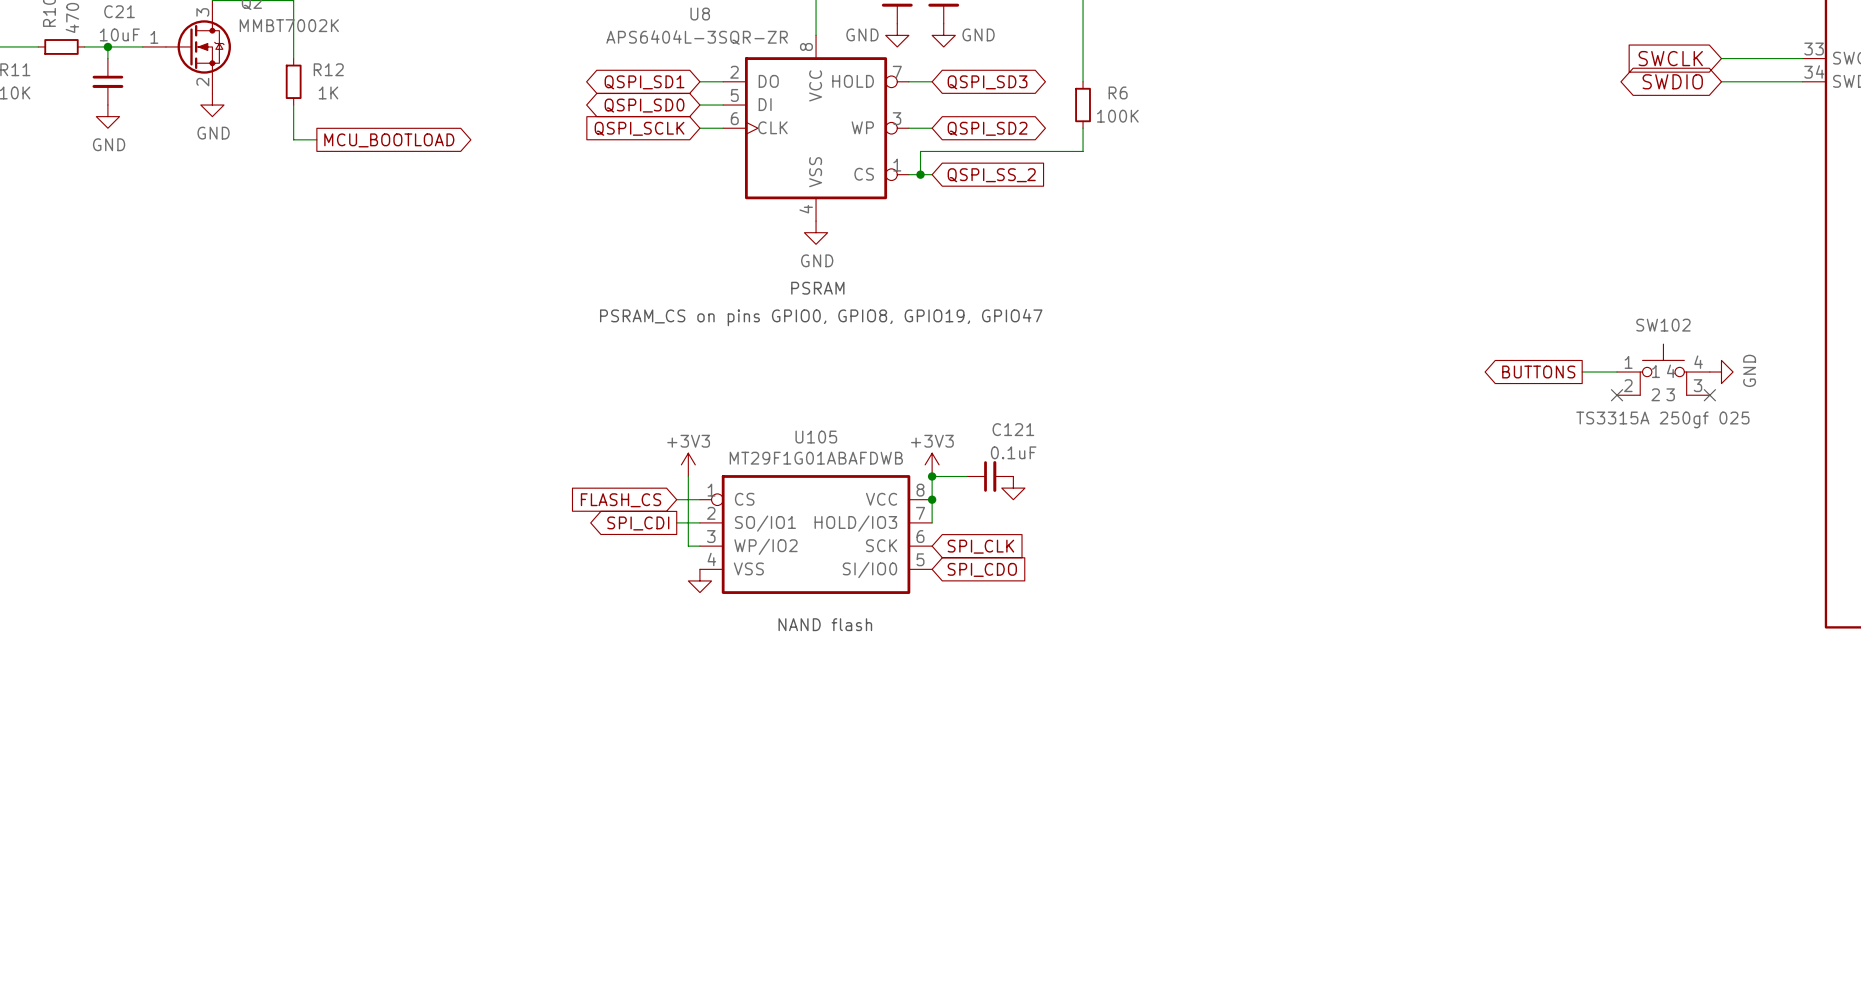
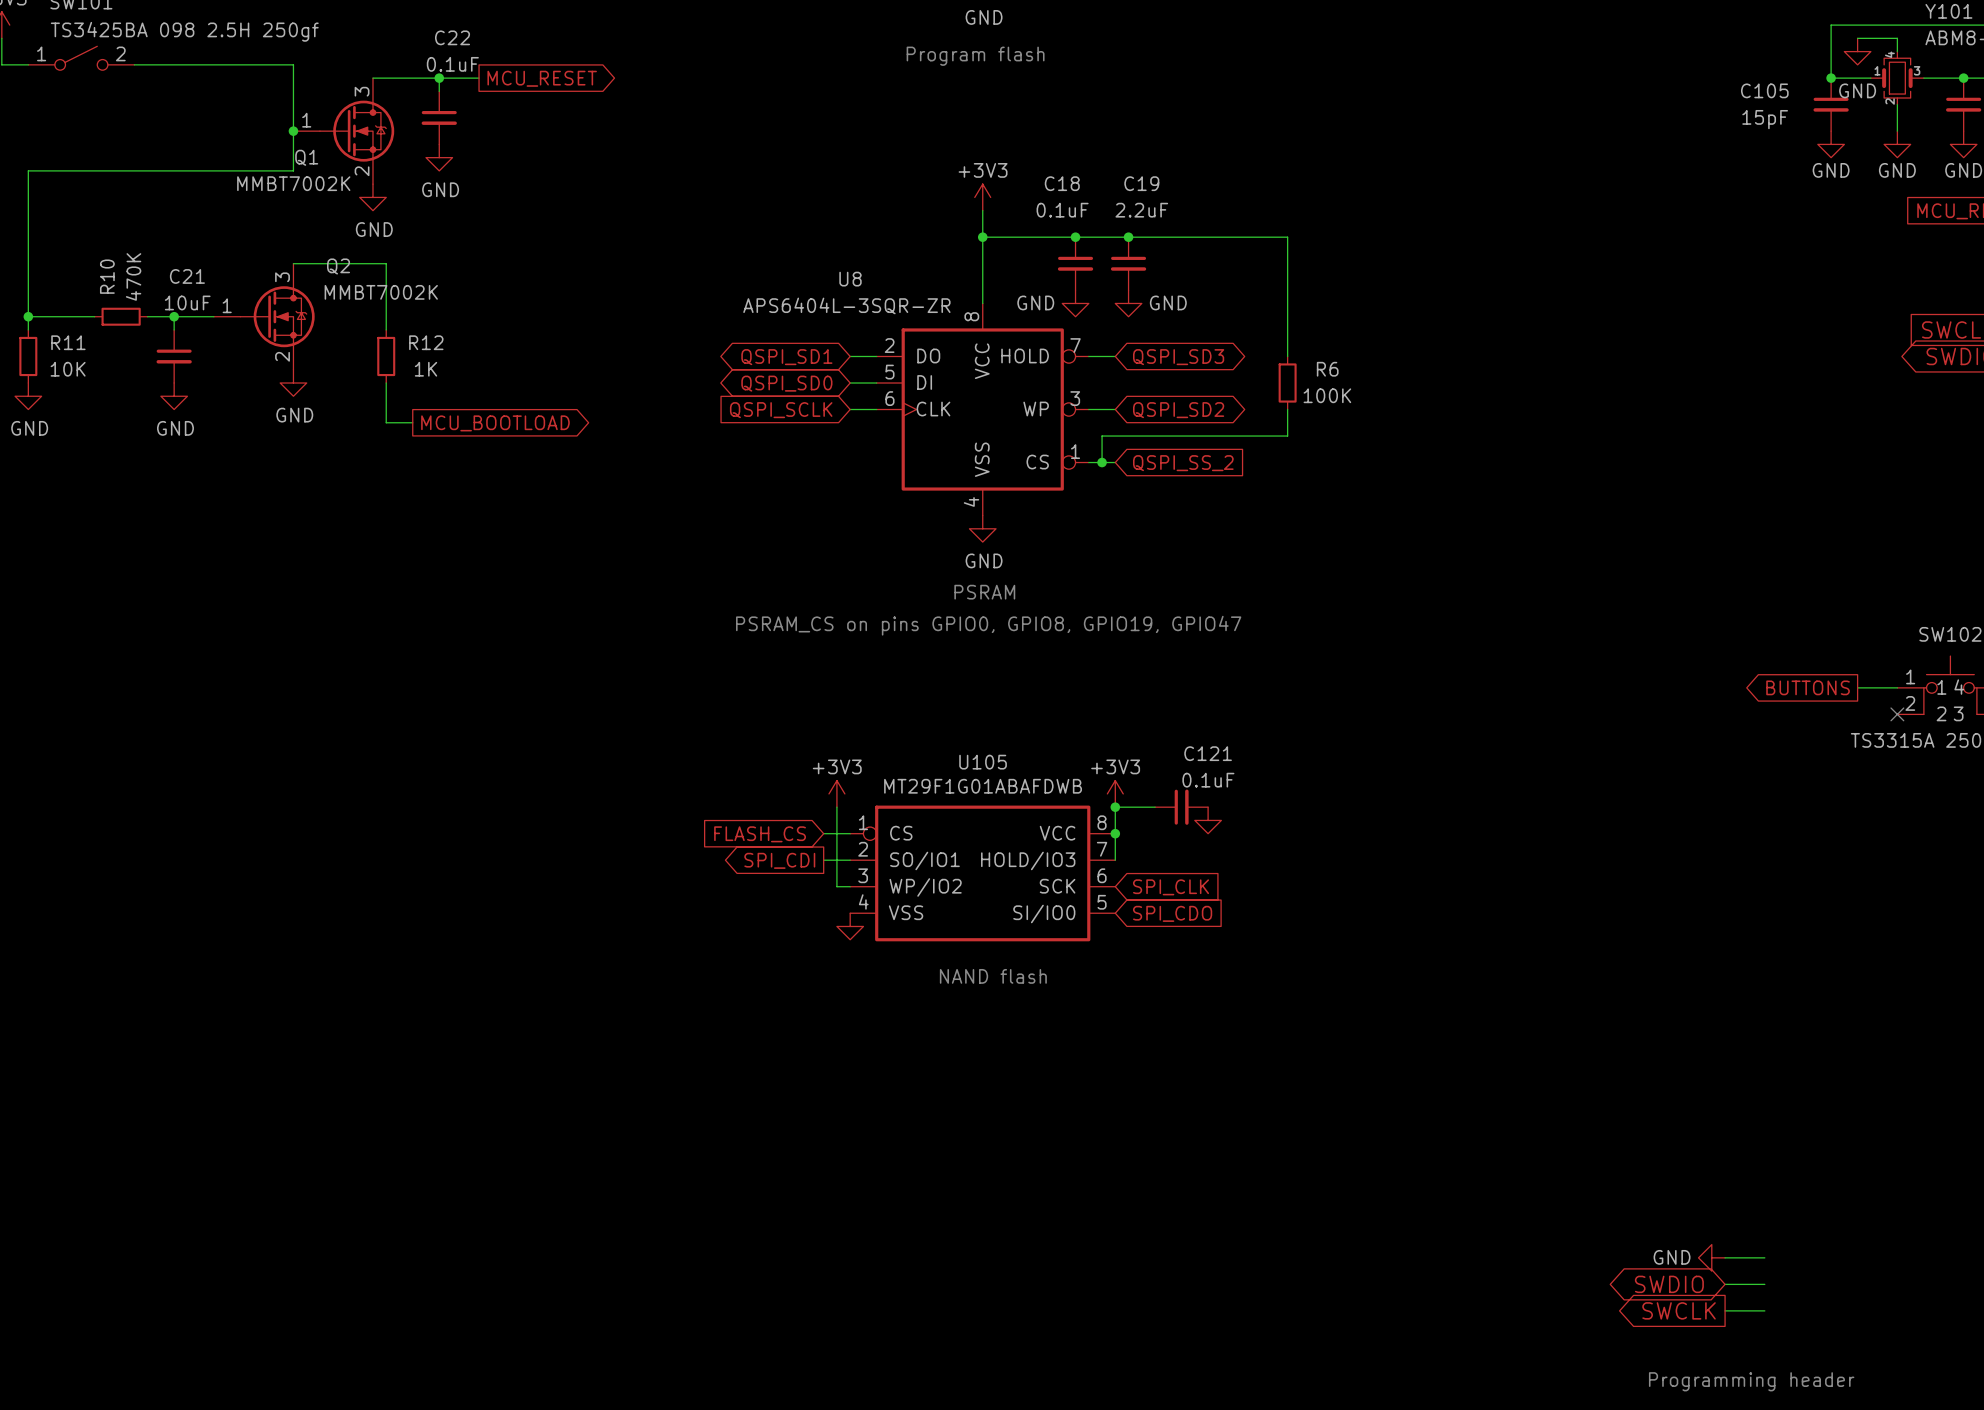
power symbol: none -> GND (1711, 1257)
wire: none -> (1725, 1257) (1764, 1257)
global label: none -> SWDIO (1669, 1284)
wire: none -> (1725, 1284) (1764, 1284)
global label: none -> SWCLK (1679, 1310)
wire: none -> (1725, 1310) (1764, 1310)
text: none -> Programming header (1751, 1381)

